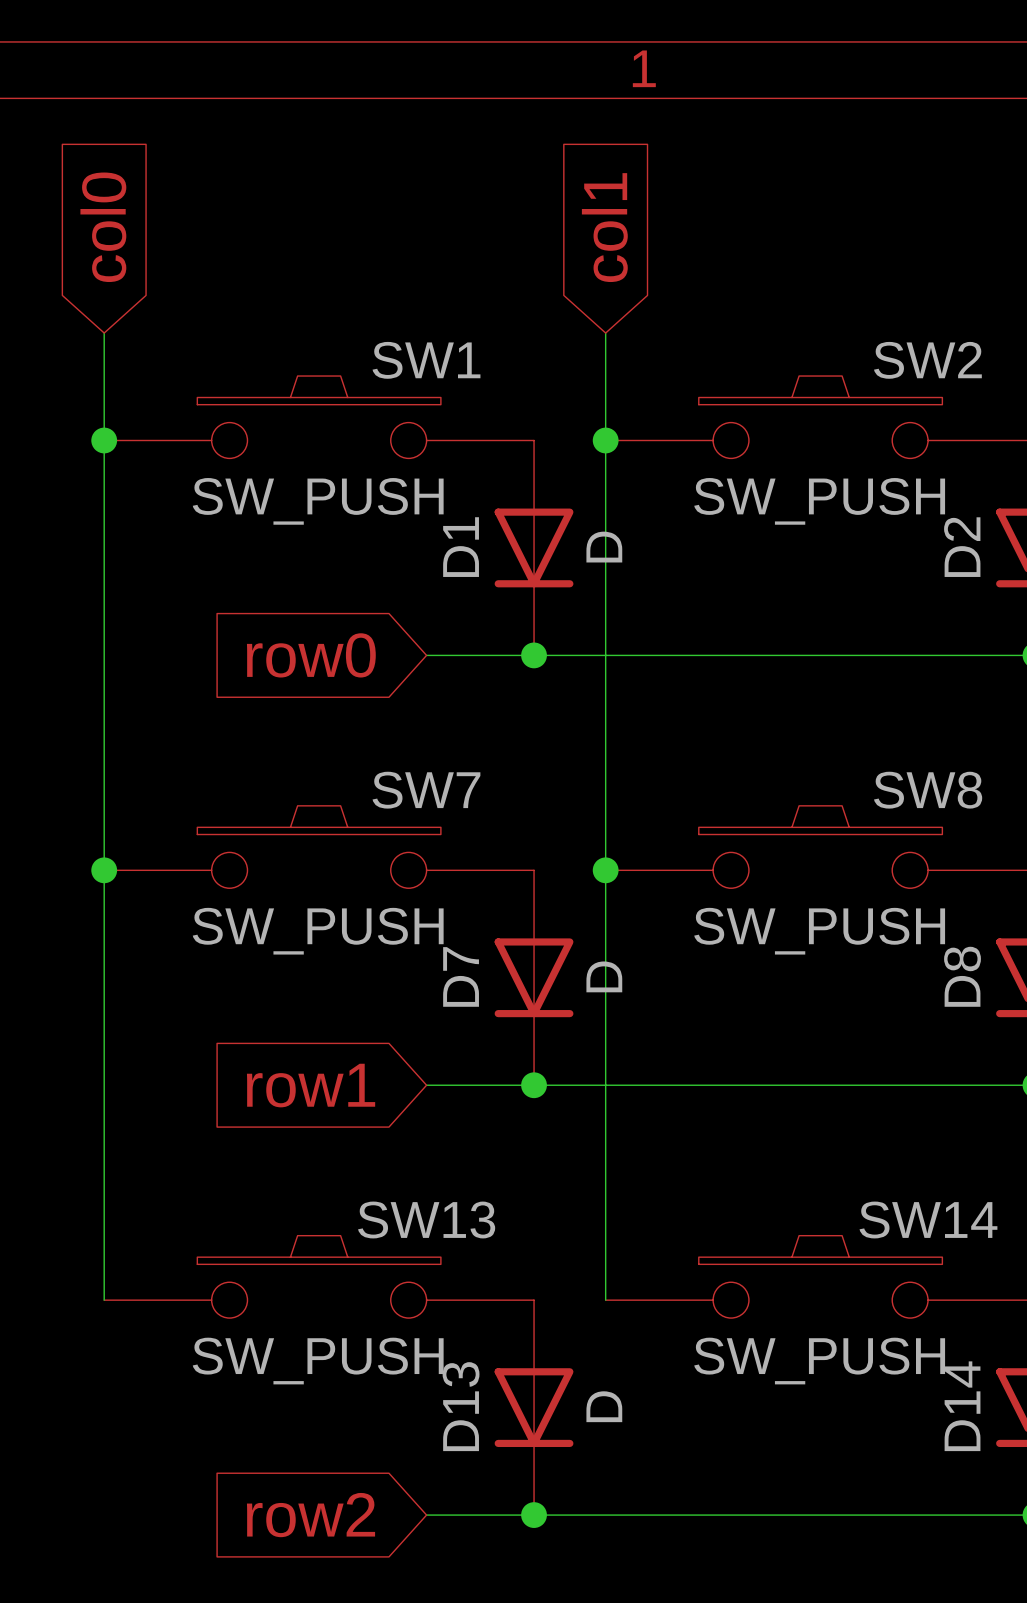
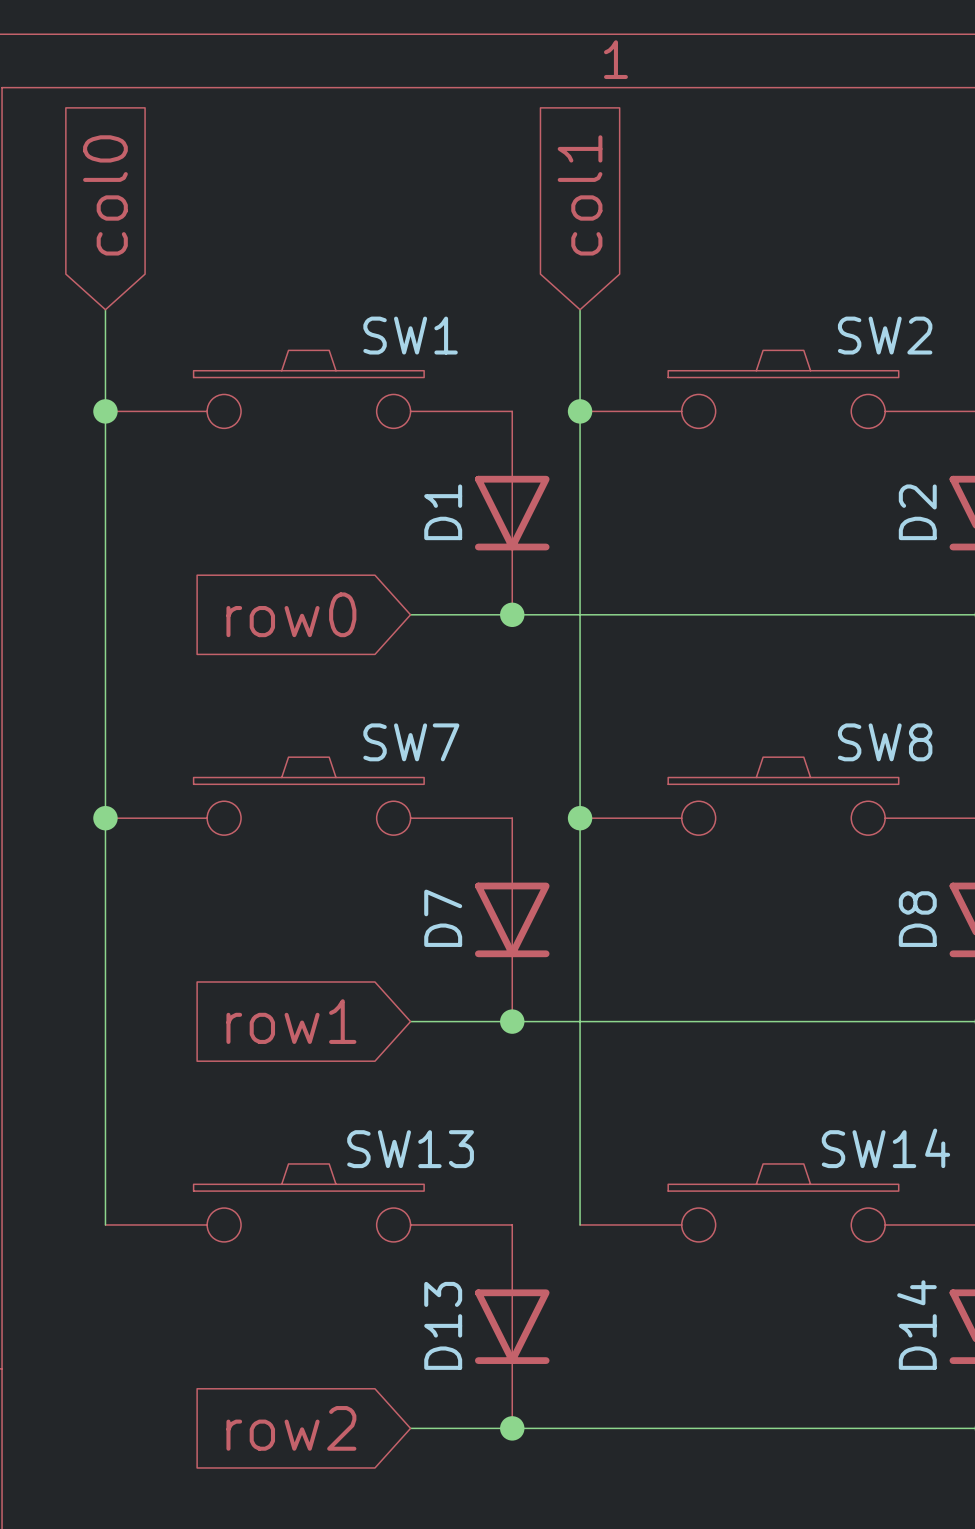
SW1 value: SW_PUSH (318, 501) -> none
SW2 value: SW_PUSH (819, 501) -> none
D1 value: D (604, 547) -> none
SW7 value: SW_PUSH (318, 931) -> none
SW8 value: SW_PUSH (819, 931) -> none
D7 value: D (604, 976) -> none
SW13 value: SW_PUSH (318, 1361) -> none
SW14 value: SW_PUSH (819, 1361) -> none
D13 value: D (604, 1406) -> none

